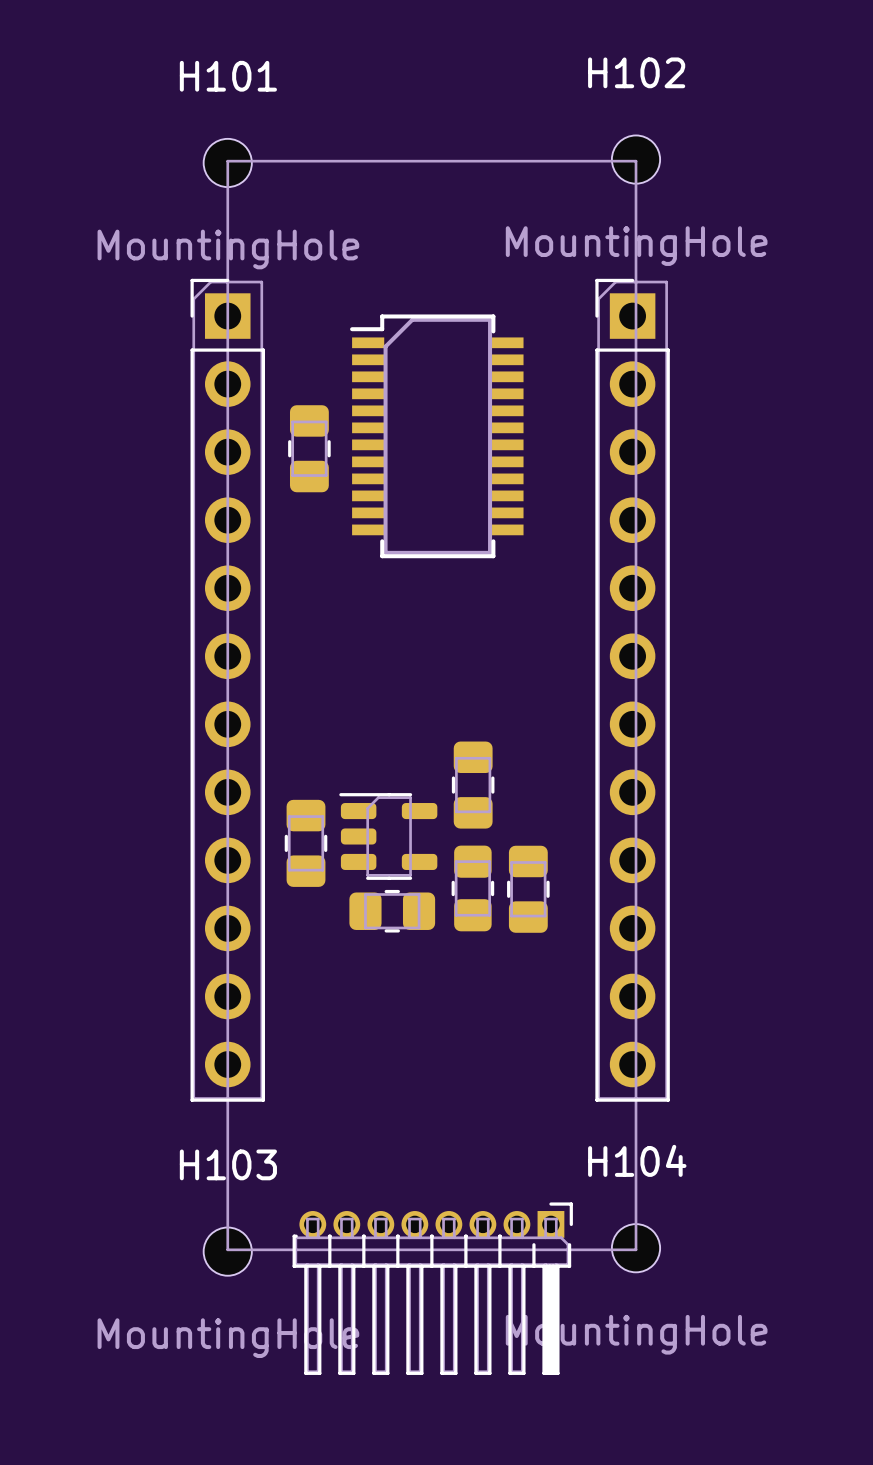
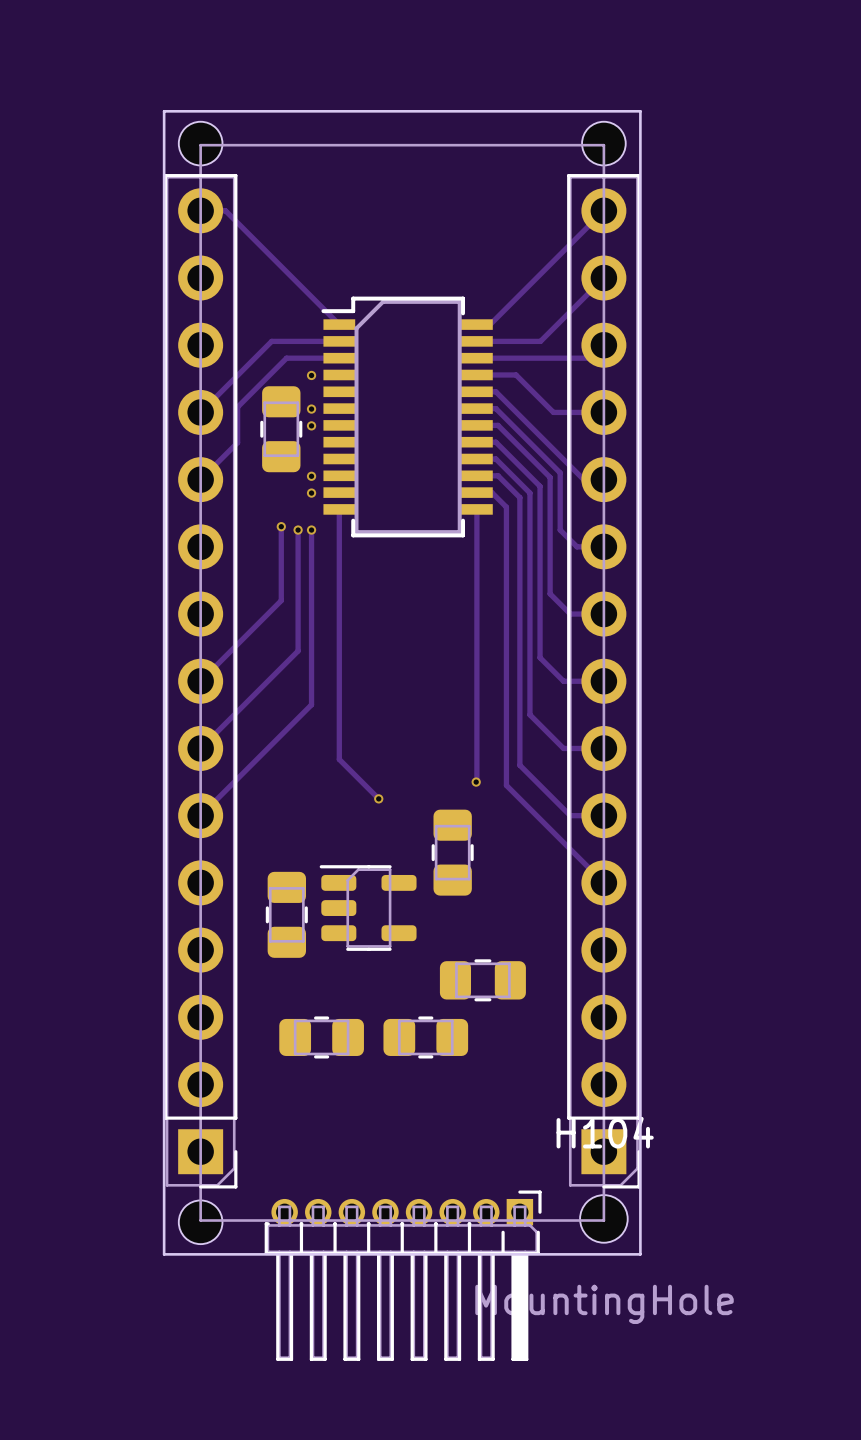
board edge: none -> (164, 111) (640, 111) (640, 1254) (164, 1254) (164, 111)
part: none -> (200, 143)
H102: MountingHole (636, 159) -> none
part: none -> (603, 143)
H101: MountingHole (227, 162) -> none
track: none -> (200, 210) (225, 210) (339, 324)
track: none -> (603, 210) (490, 324) (476, 324)
part footprint: [190, 278, 265, 1102] -> [163, 174, 238, 1189]
part footprint: [595, 278, 670, 1102] -> [567, 174, 641, 1189]
track: none -> (603, 278) (540, 341) (476, 341)
track: none -> (339, 341) (271, 341) (200, 412)
track: none -> (603, 345) (590, 358) (476, 358)
track: none -> (339, 358) (286, 358) (237, 407) (237, 442) (200, 479)
track: none -> (476, 374) (516, 374) (553, 412) (603, 412)
via: none -> (311, 375)
track: none -> (476, 391) (495, 391) (583, 479) (603, 479)
track: none -> (476, 408) (495, 408) (560, 472) (560, 530) (577, 546) (603, 546)
via: none -> (311, 409)
track: none -> (476, 425) (498, 425) (550, 477) (550, 593) (570, 614) (603, 614)
via: none -> (311, 425)
track: none -> (476, 442) (495, 442) (540, 486) (540, 657) (563, 681) (603, 681)
track: none -> (476, 459) (495, 459) (529, 493) (529, 714) (563, 748) (603, 748)
track: none -> (476, 475) (498, 475) (519, 497) (519, 765) (570, 815) (603, 815)
via: none -> (311, 476)
track: none -> (476, 492) (491, 492) (506, 507) (506, 785) (603, 882)
via: none -> (311, 493)
track: none -> (339, 509) (339, 759) (378, 798)
track: none -> (476, 509) (476, 782)
track: none -> (281, 526) (281, 600) (200, 681)
via: none -> (281, 526)
track: none -> (298, 530) (298, 651) (200, 748)
via: none -> (298, 530)
track: none -> (311, 530) (311, 704) (200, 815)
via: none -> (311, 530)
part: (473, 785) -> none
via: none -> (476, 782)
via: none -> (378, 798)
part: (388, 836) -> none
part position: (306, 843) -> (286, 914)
part footprint: [451, 845, 495, 932] -> [431, 809, 474, 896]
part footprint: [349, 889, 436, 933] -> [319, 865, 417, 951]
part: (528, 889) -> none
part: none -> (482, 980)
part: none -> (321, 1037)
part: none -> (425, 1037)
H103: MountingHole (227, 1251) -> none
part: none -> (200, 1222)
part position: (432, 1288) -> (403, 1275)

